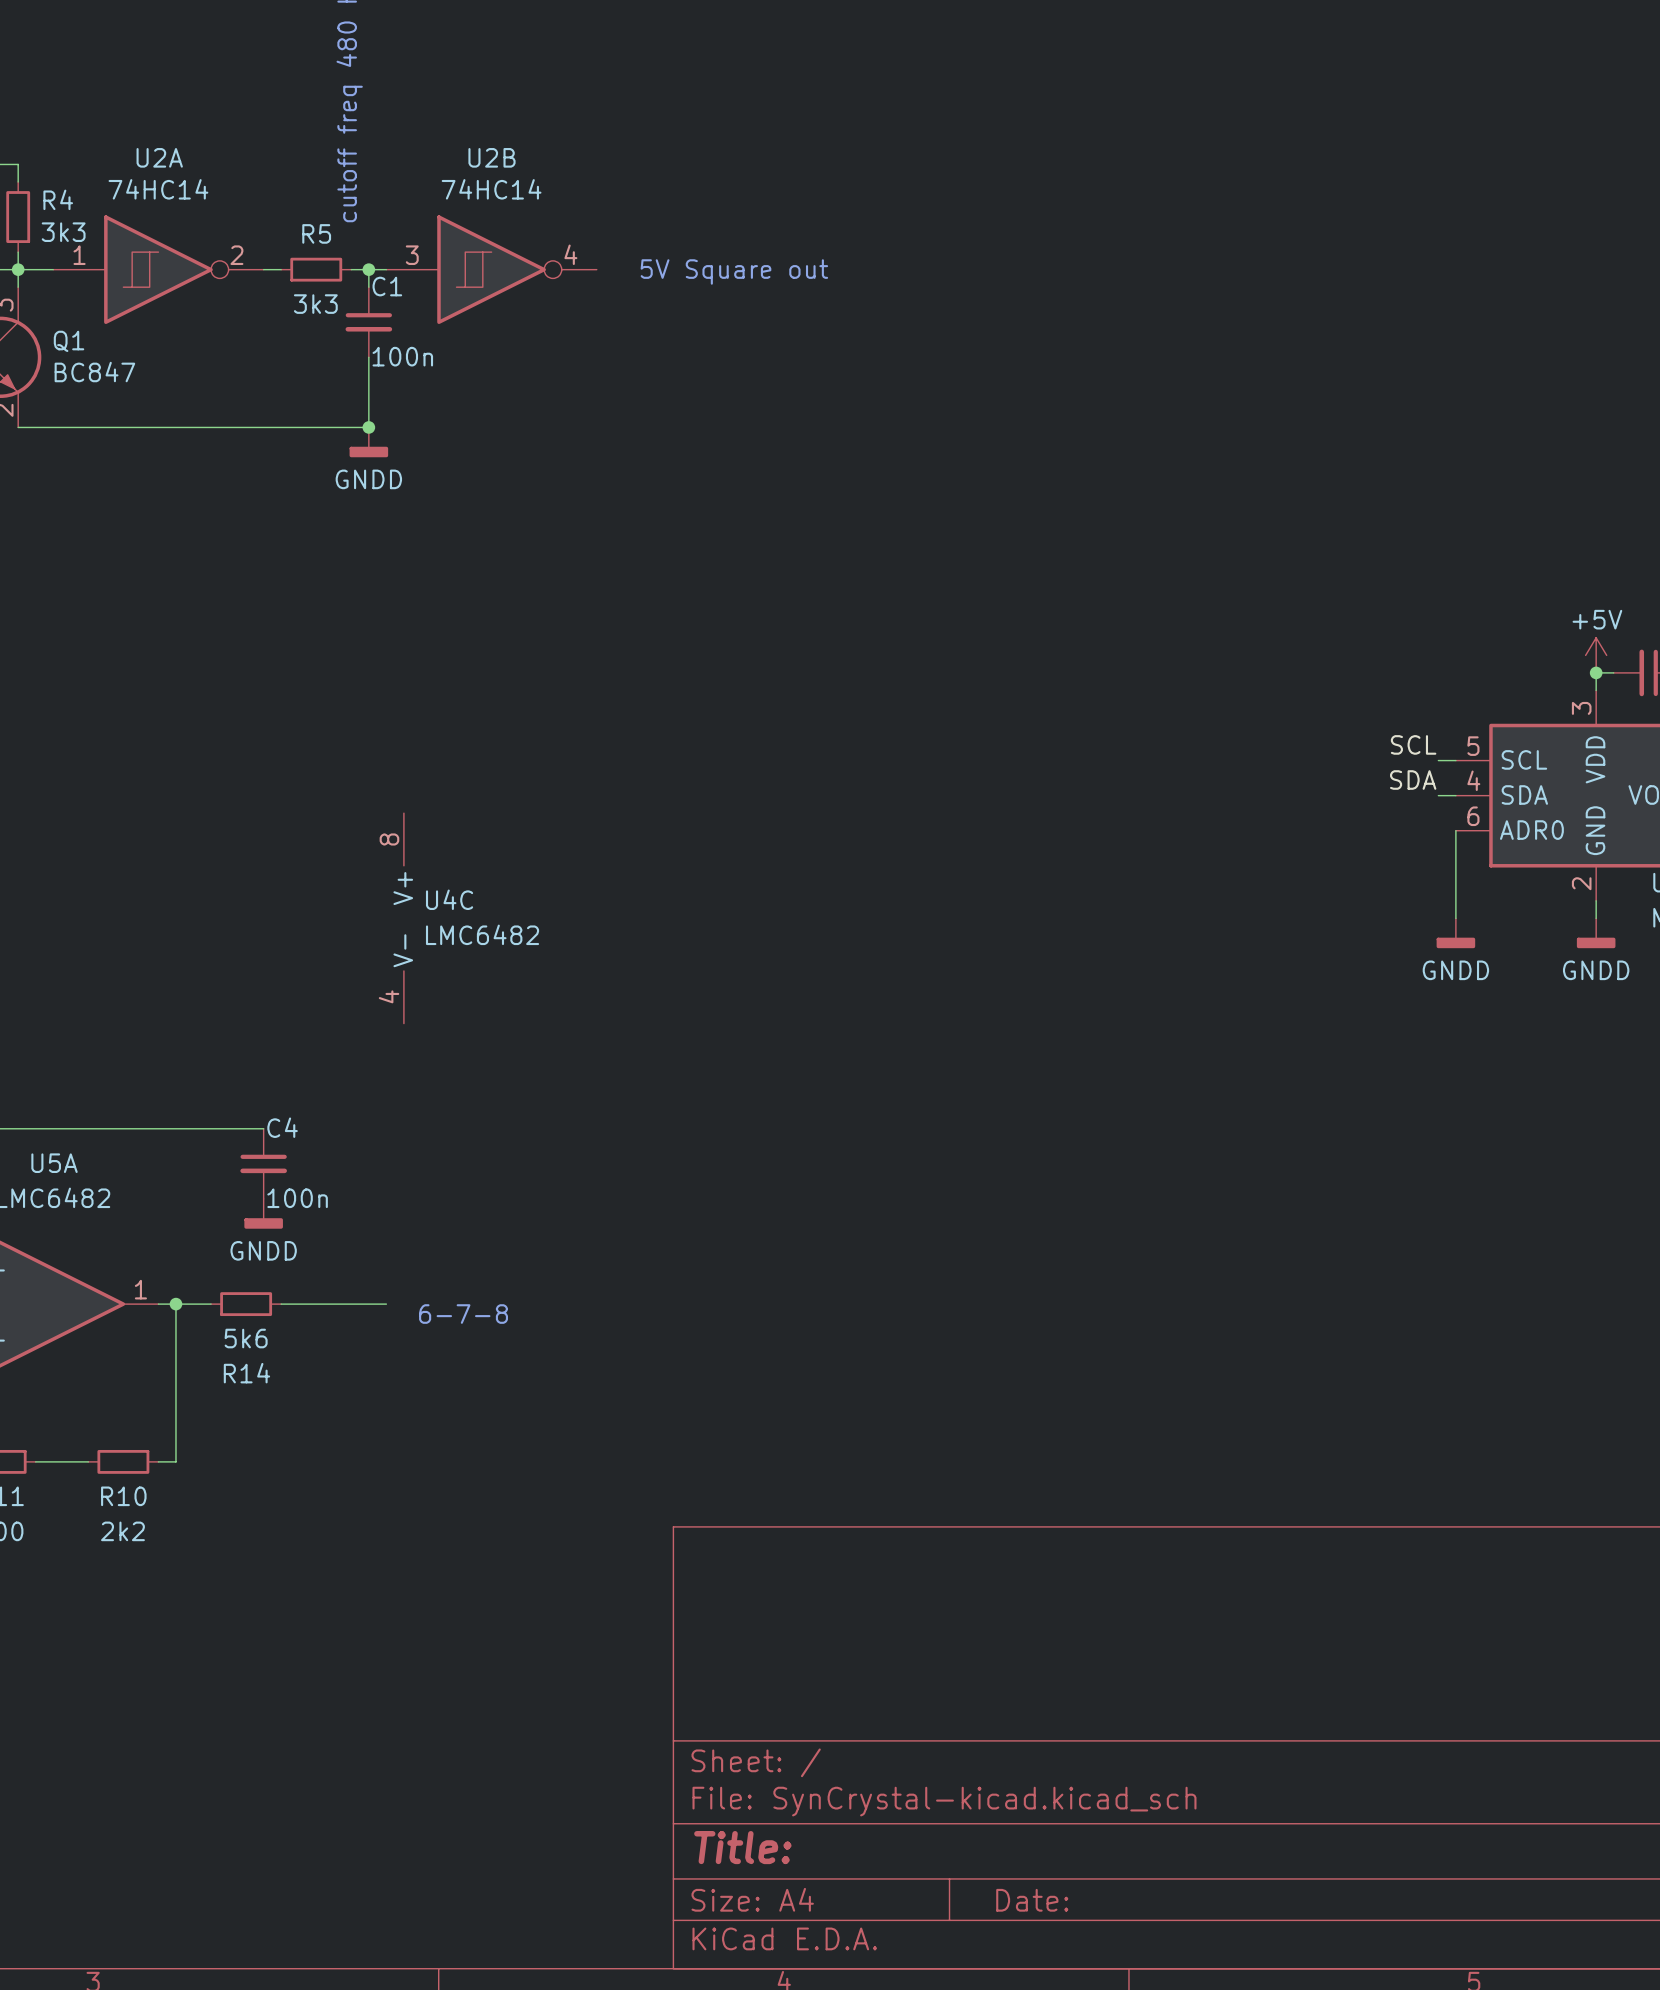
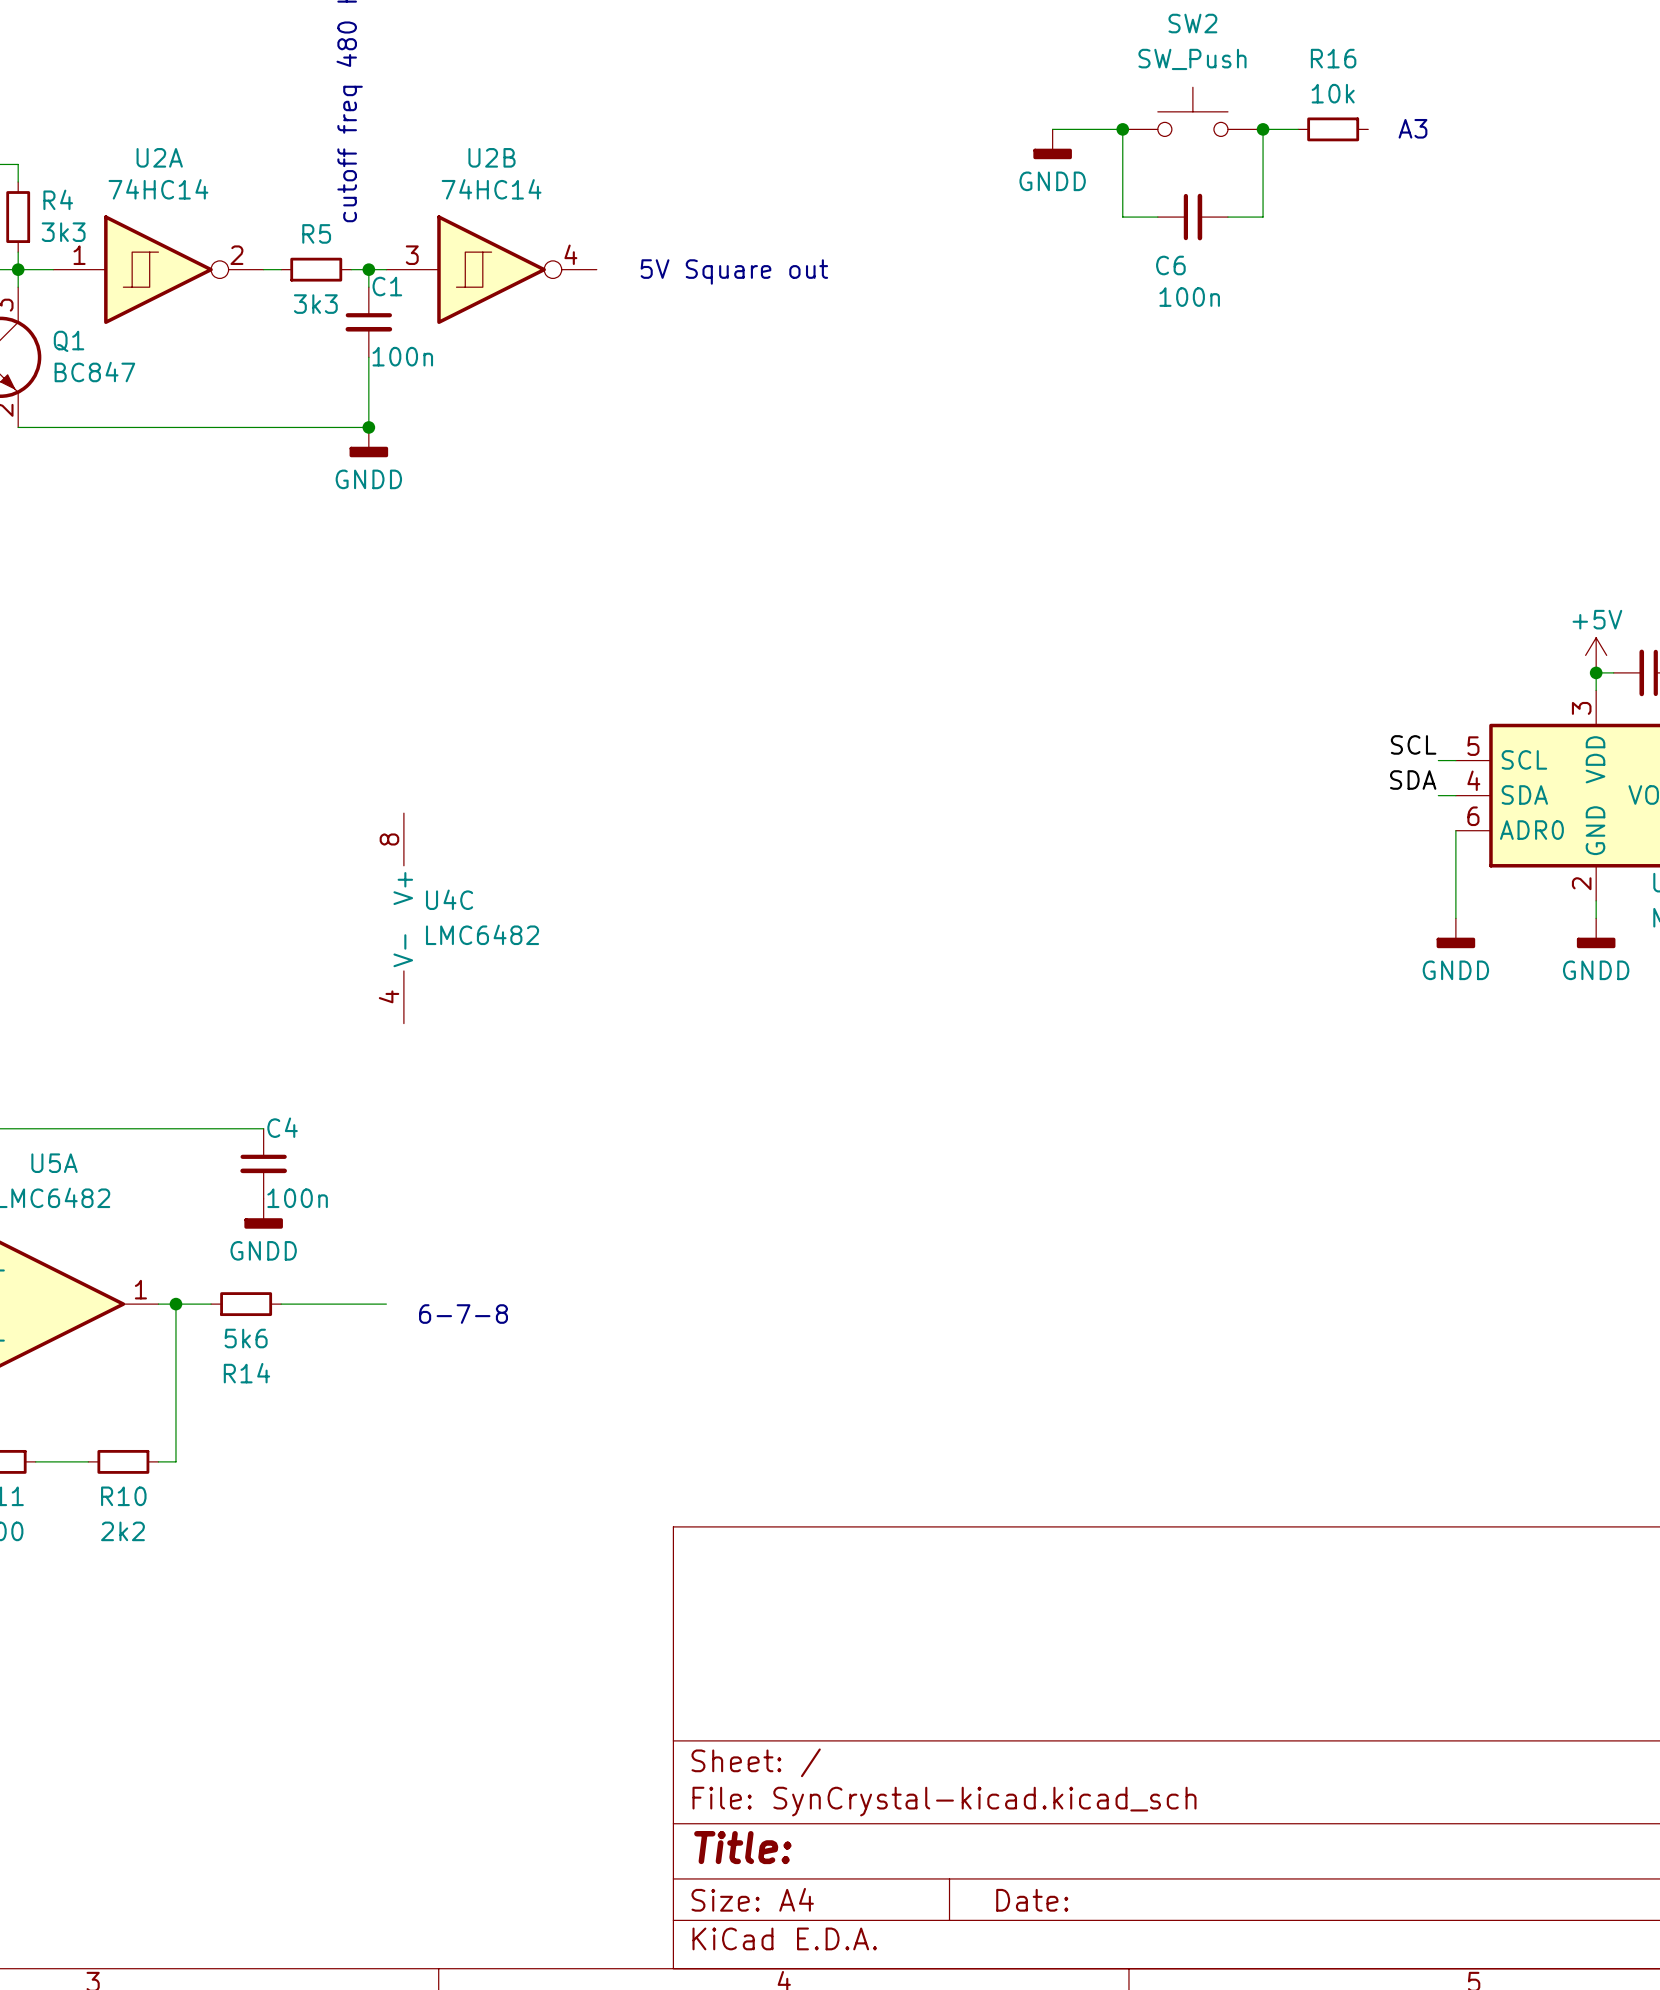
SW2: none -> SW_Push (1192, 111)
text: none -> A3 (1412, 128)
wire: none -> (1052, 129) (1122, 129) (1122, 217) (1157, 217)
junction: none -> (1122, 129)
junction: none -> (1263, 129)
wire: none -> (1298, 129) (1263, 129) (1263, 217) (1227, 217)
R16: none -> 10k (1333, 129)
power symbol: none -> GNDD (1052, 144)
C6: none -> 100n (1192, 217)

